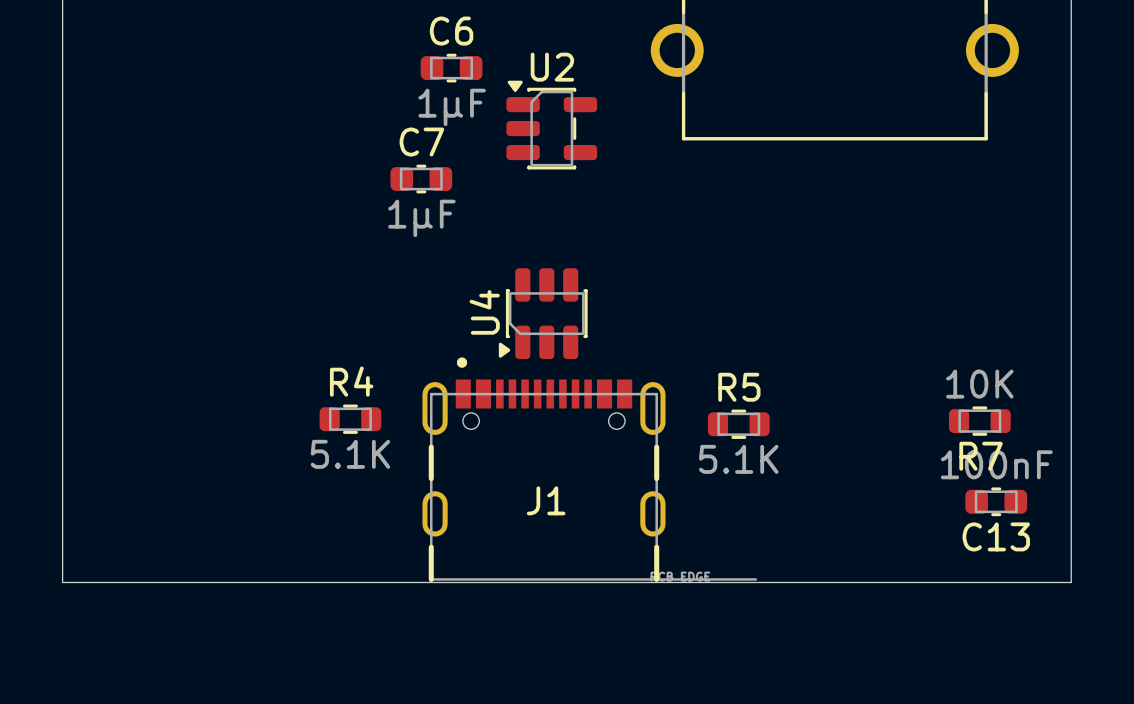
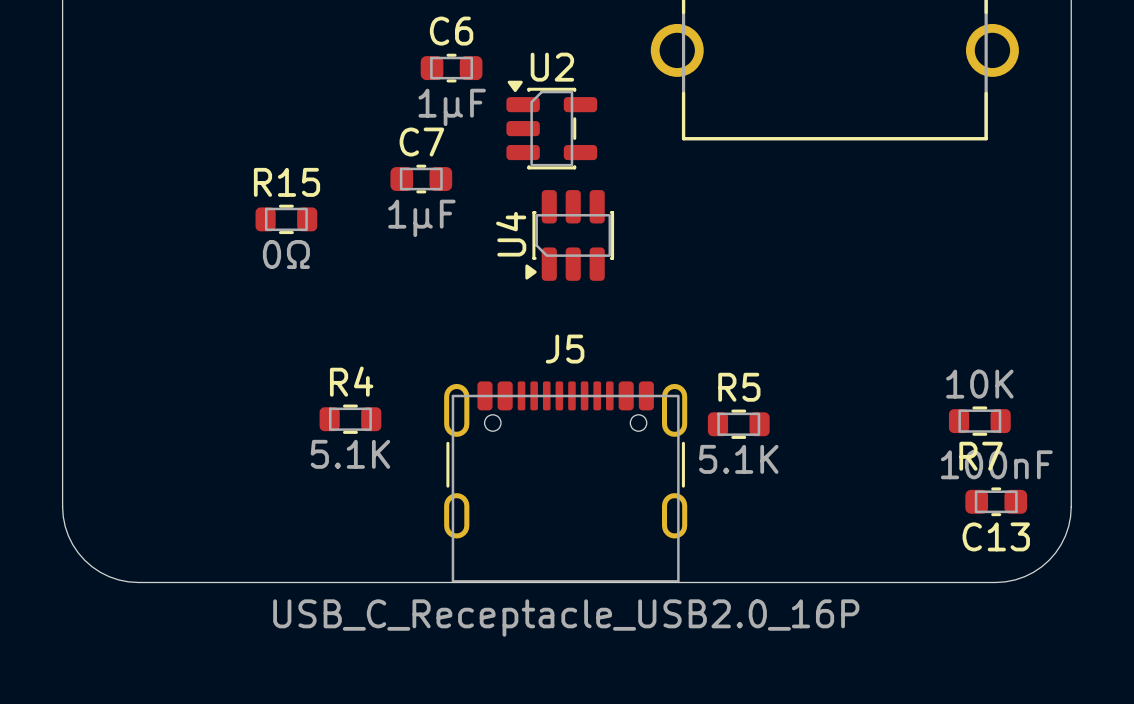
R15: none -> 0Ω (286, 219)
U4 position: (543, 313) -> (569, 235)
J1: (589, 469) -> none
J5: none -> USB_C_Receptacle_USB2.0_16P (565, 482)
board edge: (62, 506) (62, 582) (138, 582) -> (62, 506) (68, 535) (84, 560) (109, 576) (138, 582)
board edge: (1071, 506) (1071, 582) (995, 582) -> (1071, 506) (1065, 535) (1049, 560) (1024, 576) (995, 582)

